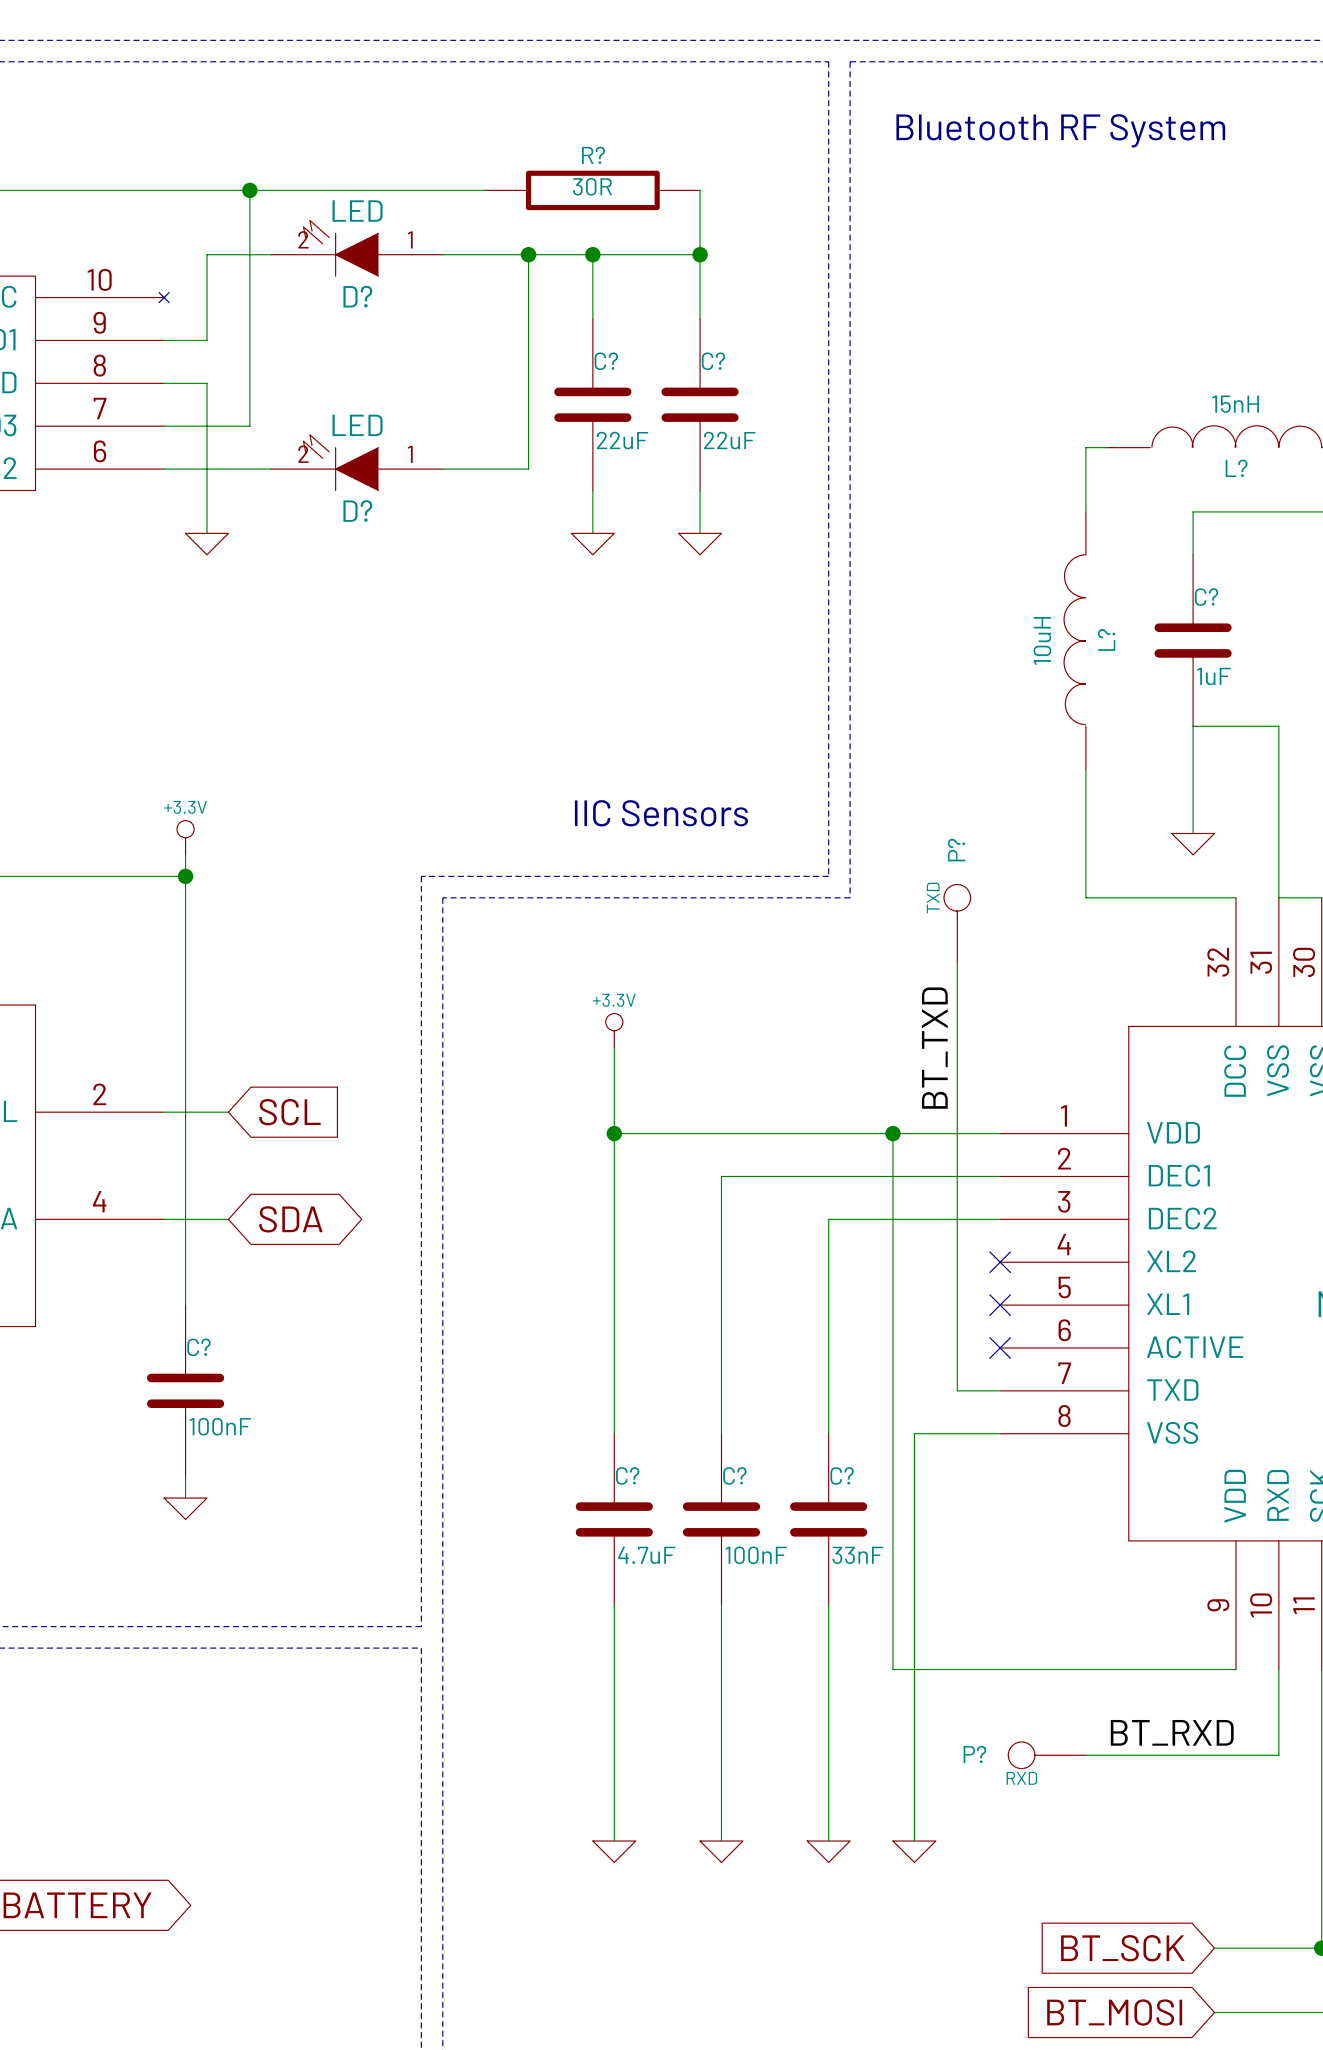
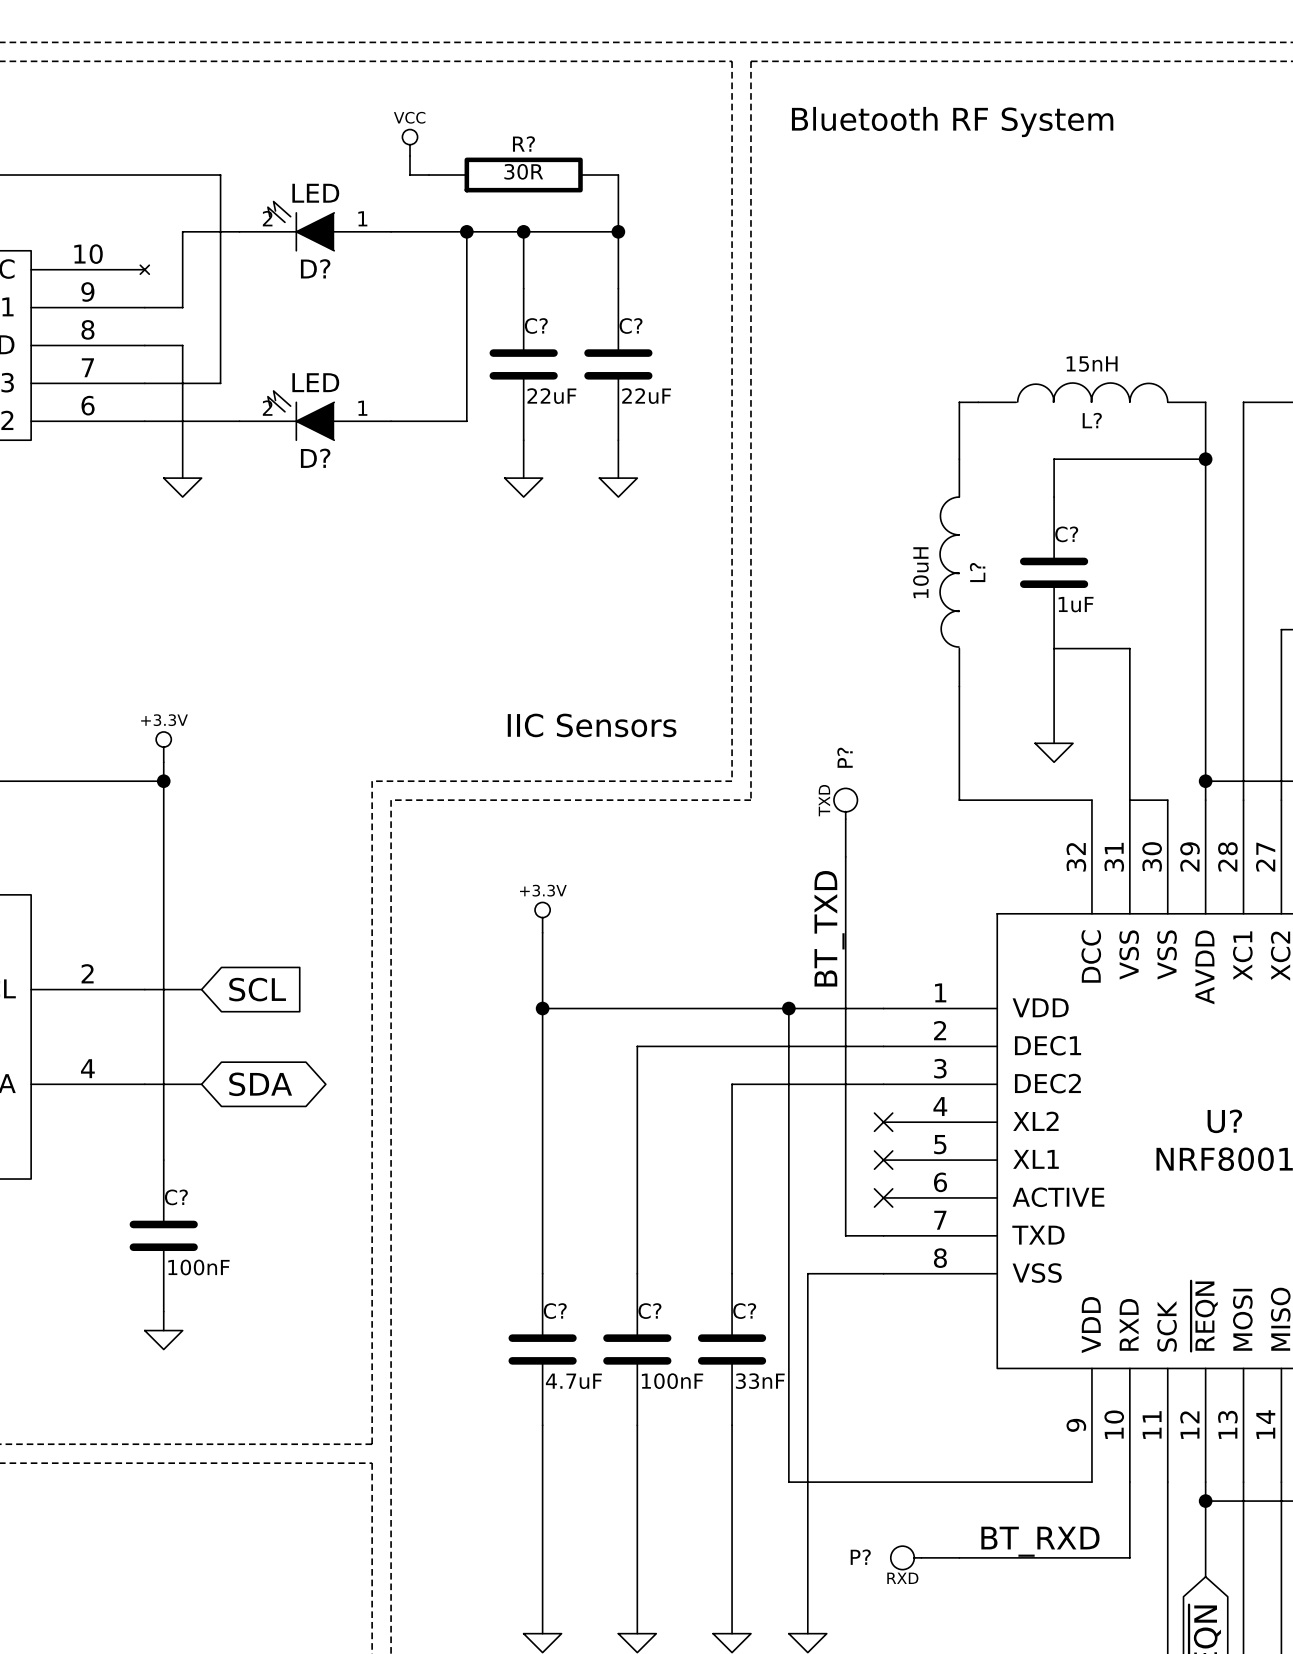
power symbol: none -> VCC (410, 142)
wire: (249, 190) (464, 190) -> (410, 156) (410, 175)
junction: (249, 190) -> none

